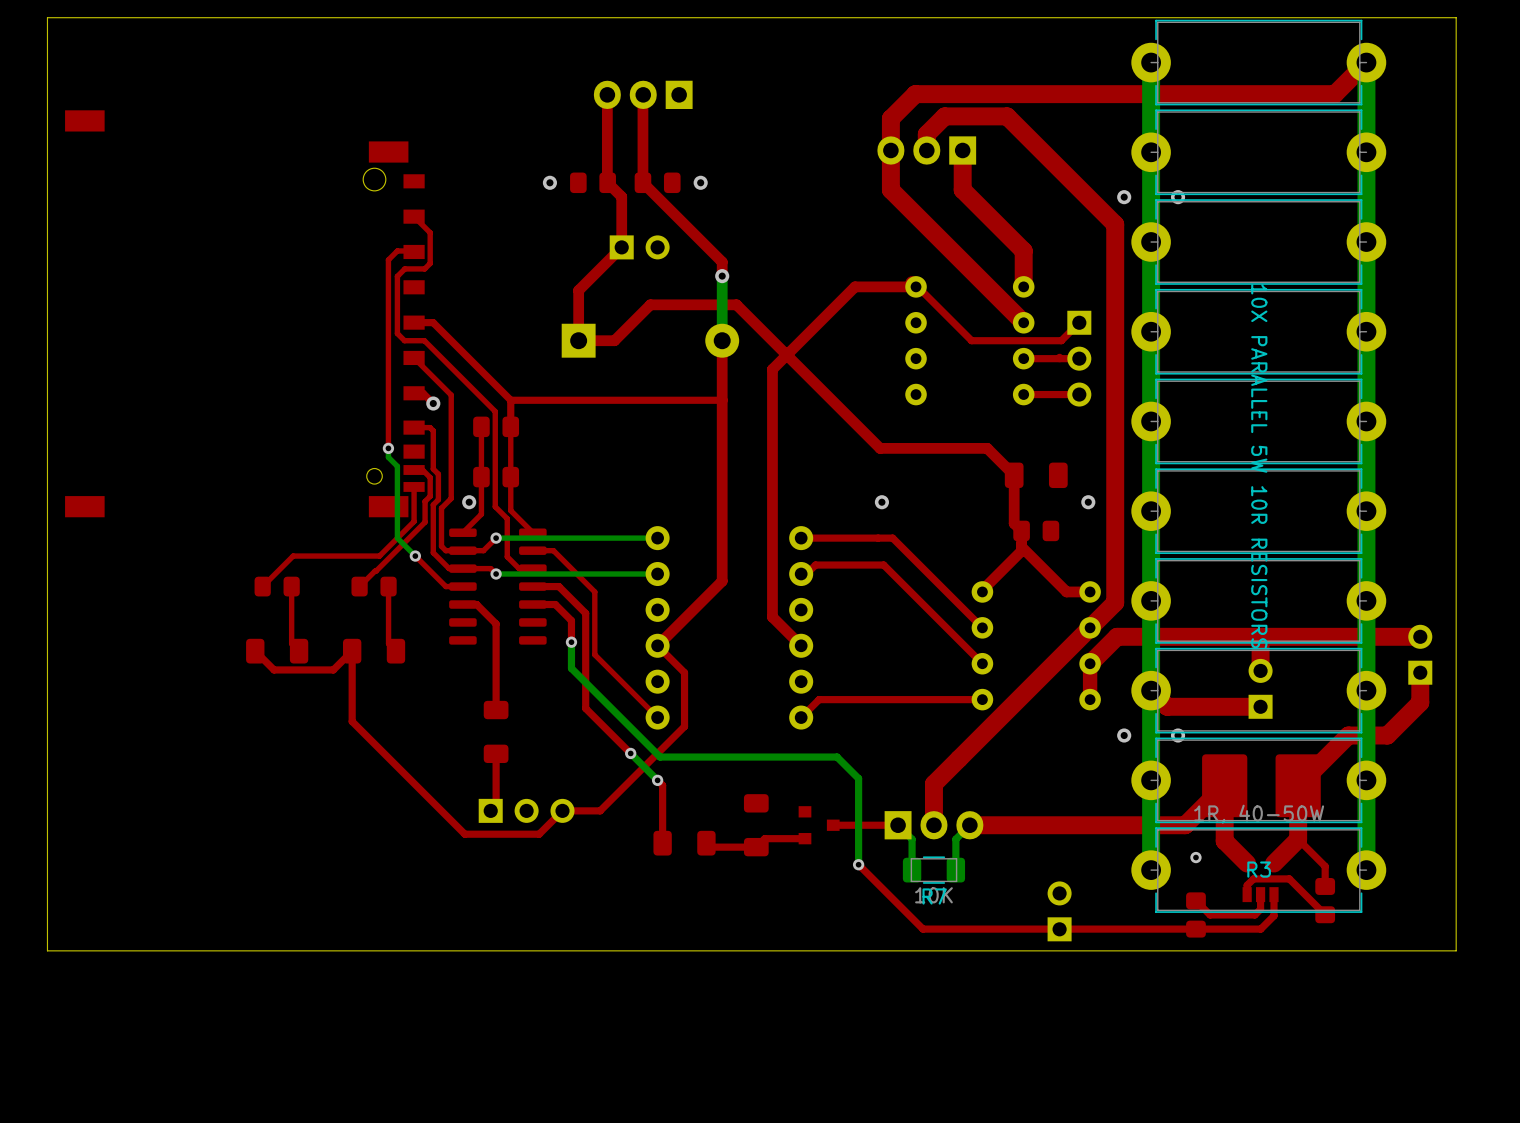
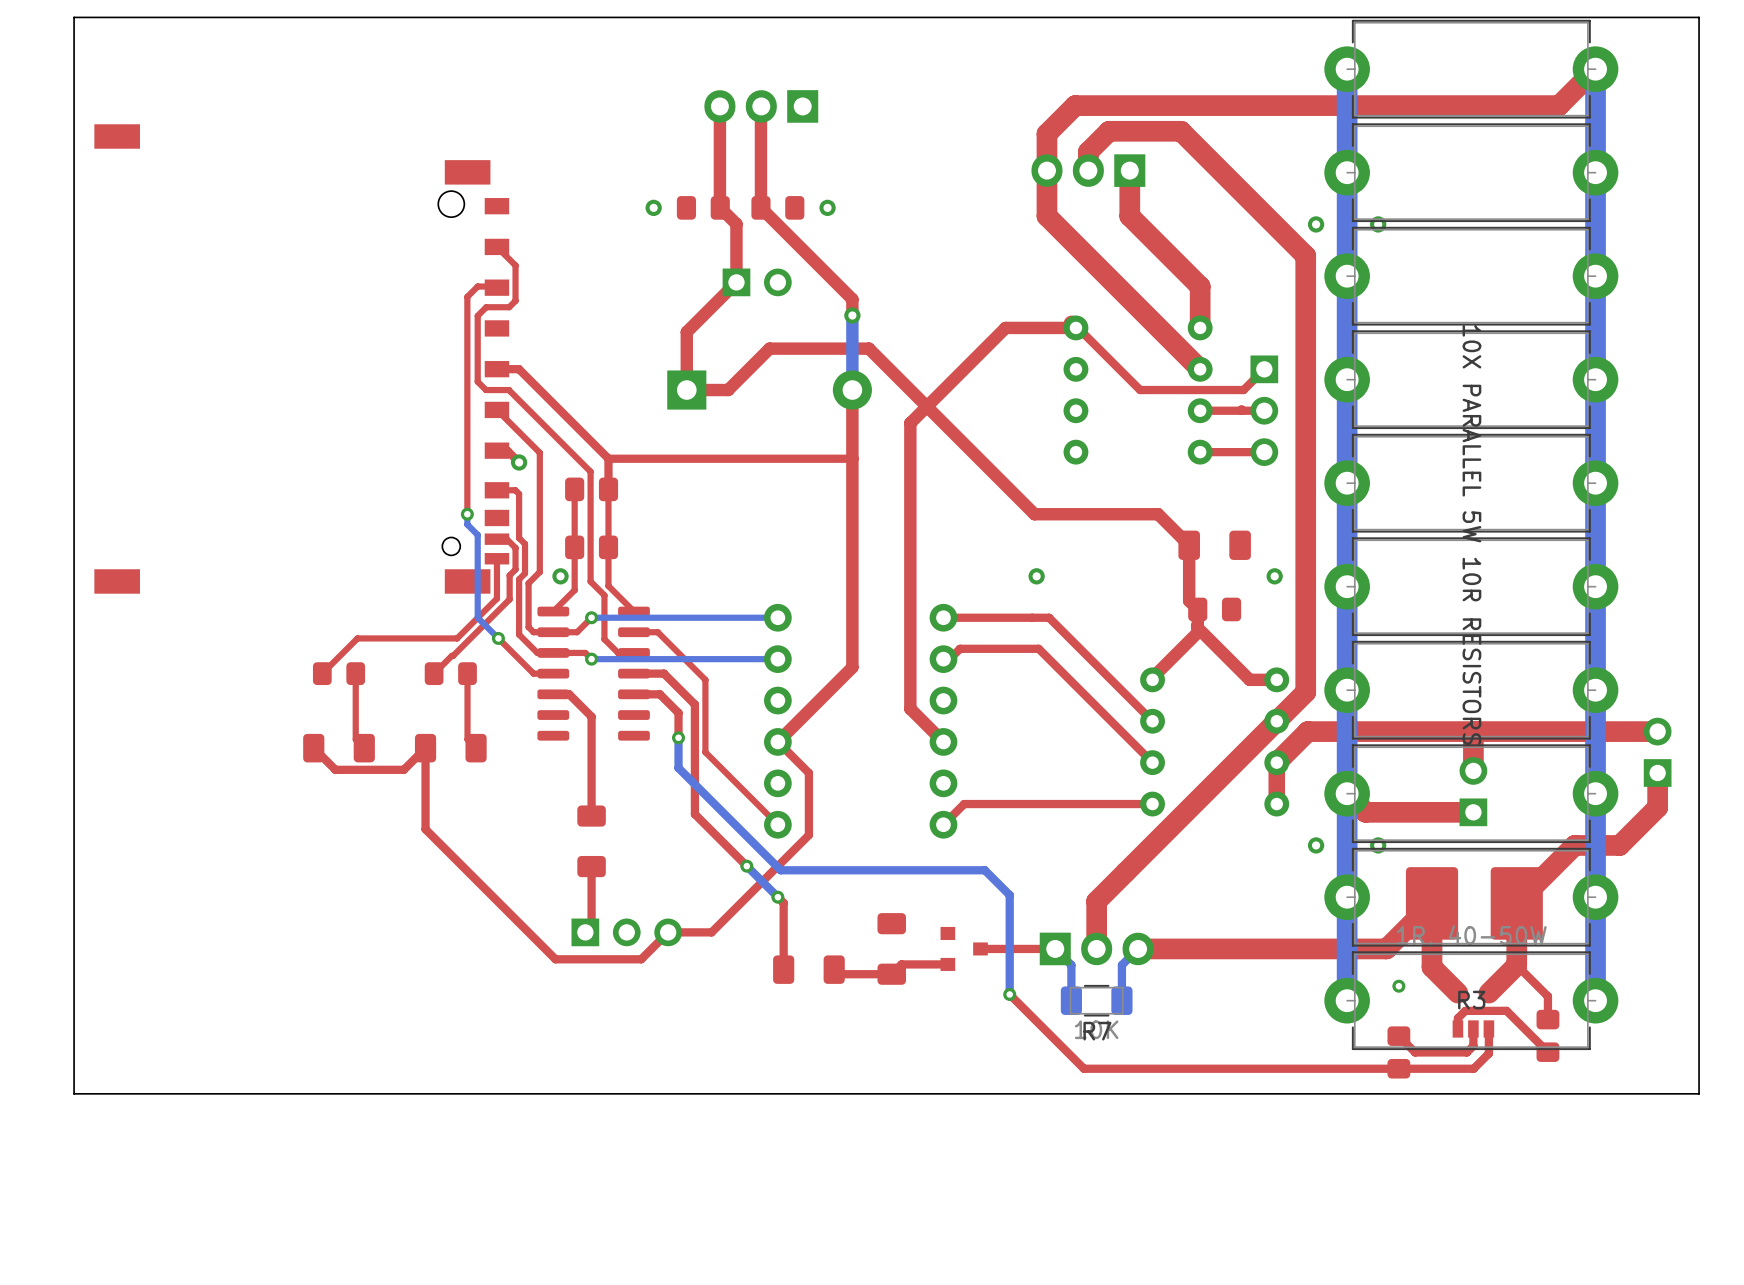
part: (1059, 911) -> none

